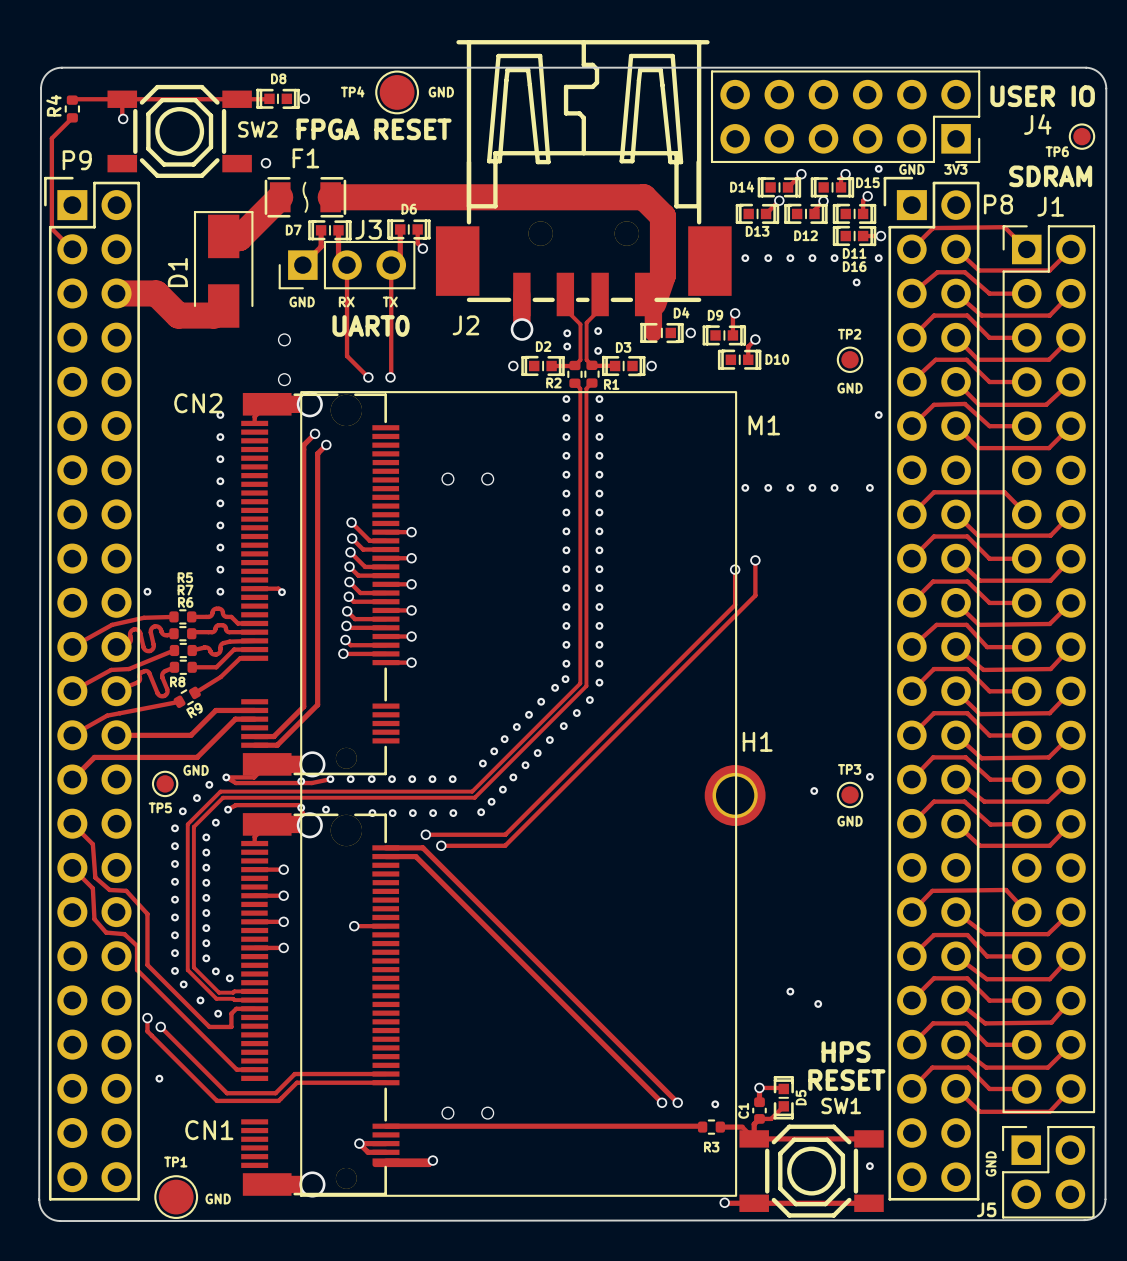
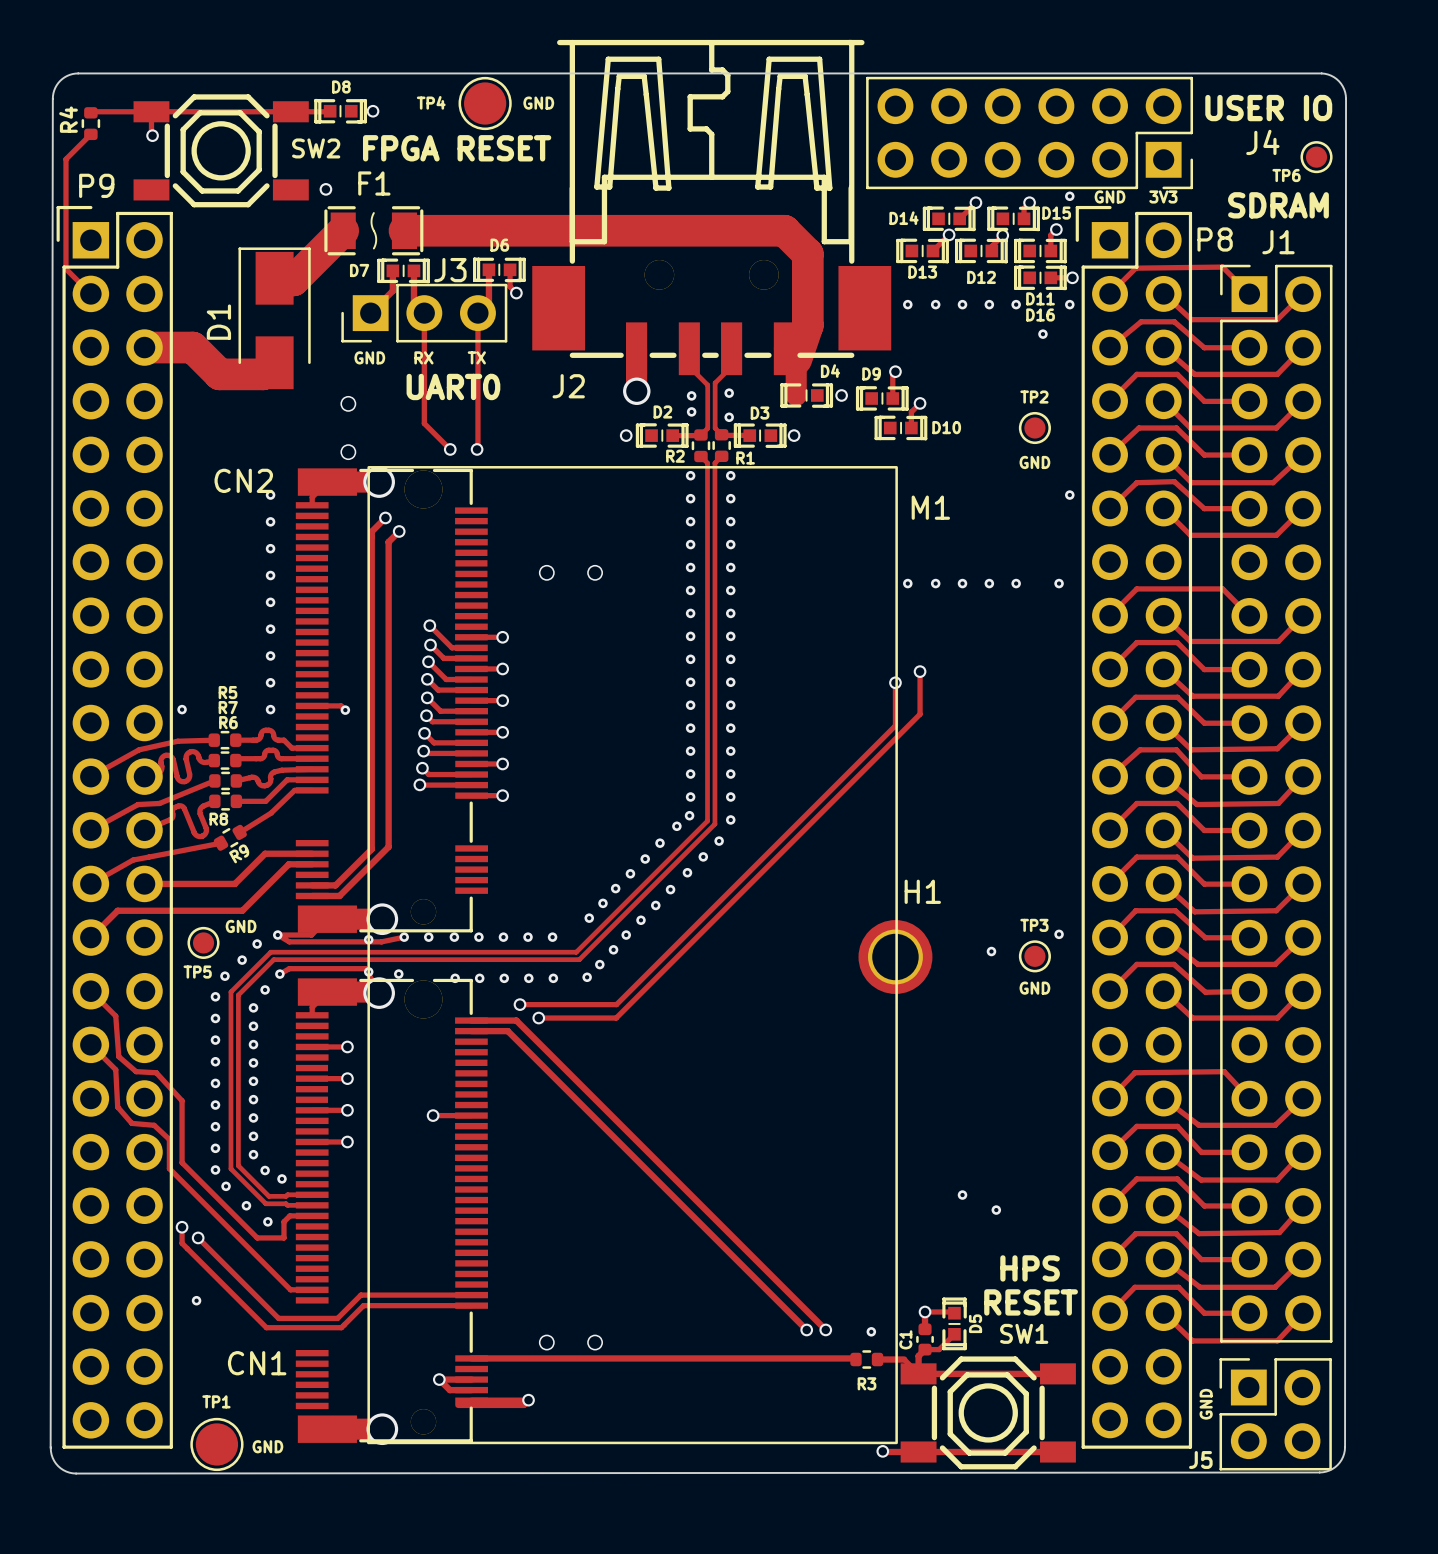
via: (869, 1166) -> none

